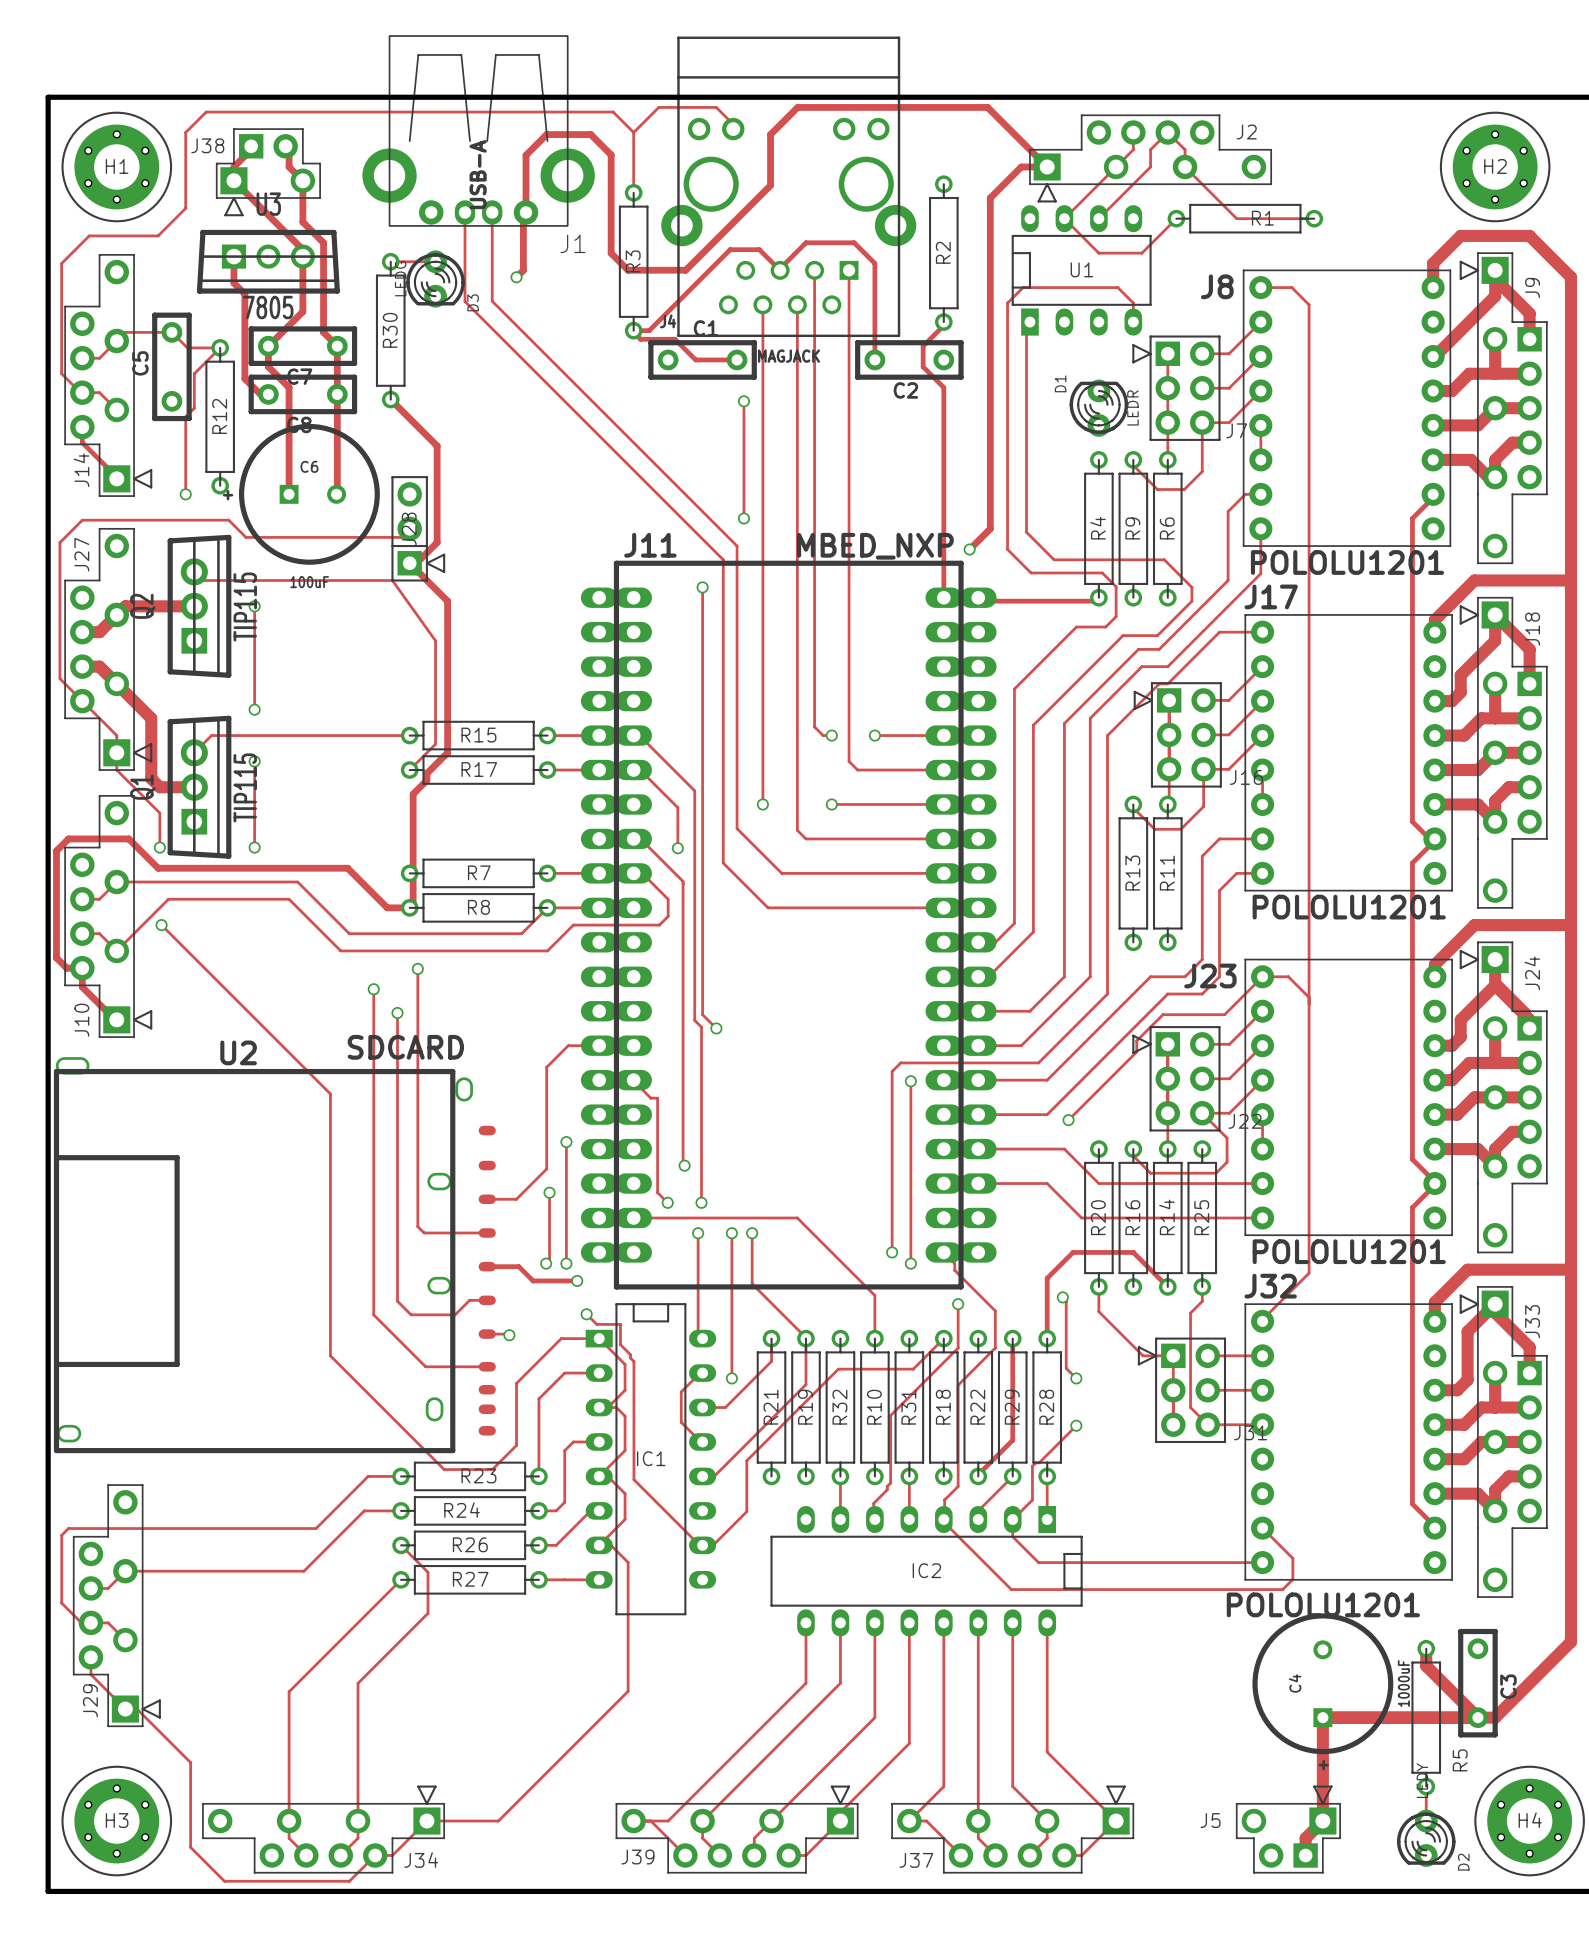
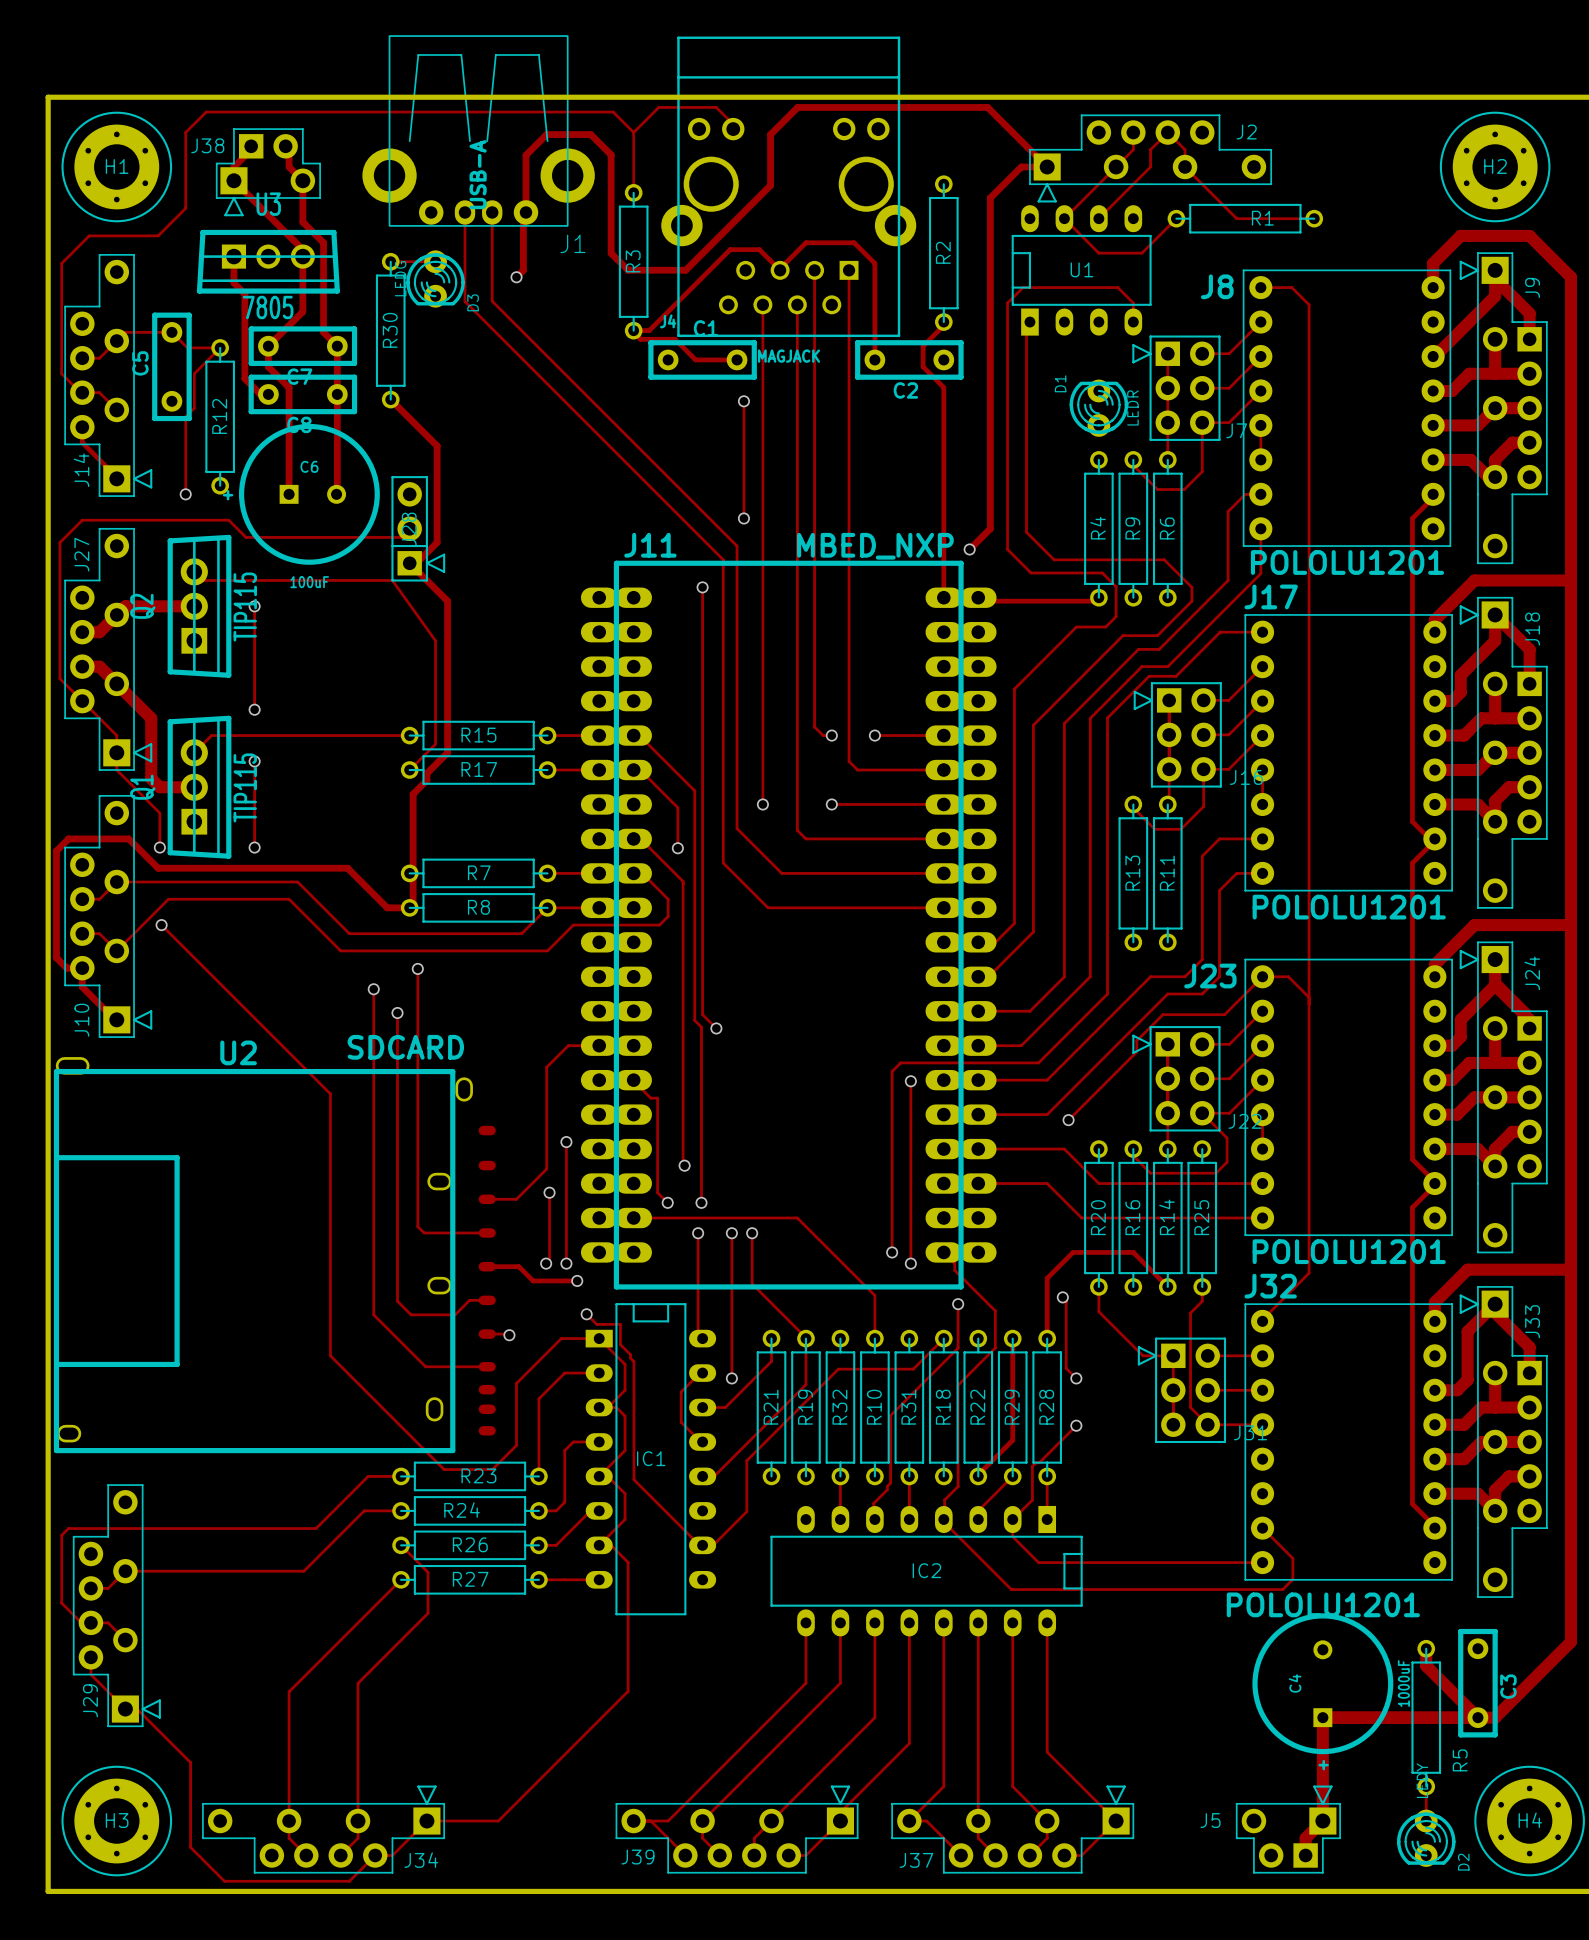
track: (1219, 632) (1167, 683) (1159, 683) (1107, 735) -> (1220, 632) (1176, 676) (1149, 676) (1107, 717) (1107, 735)

